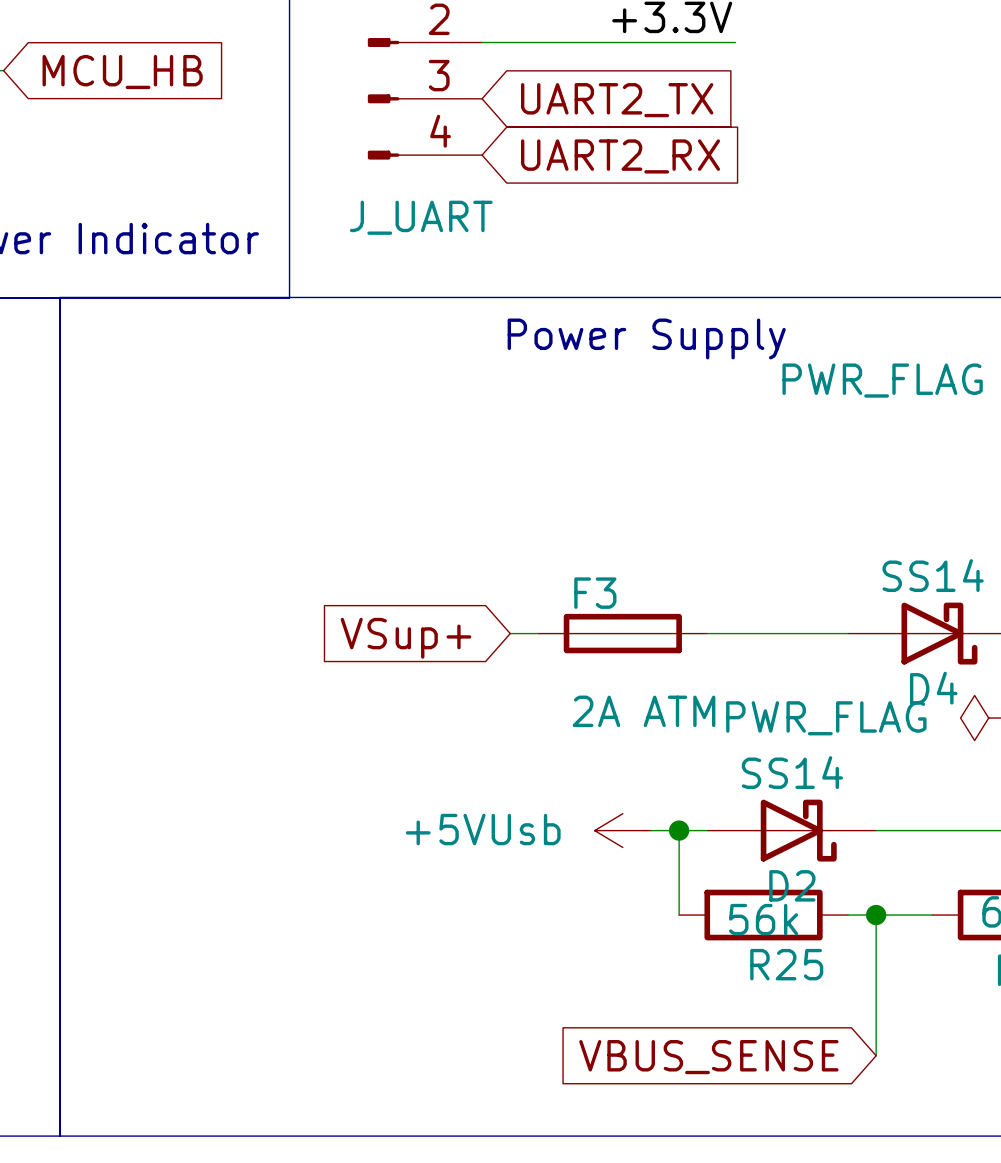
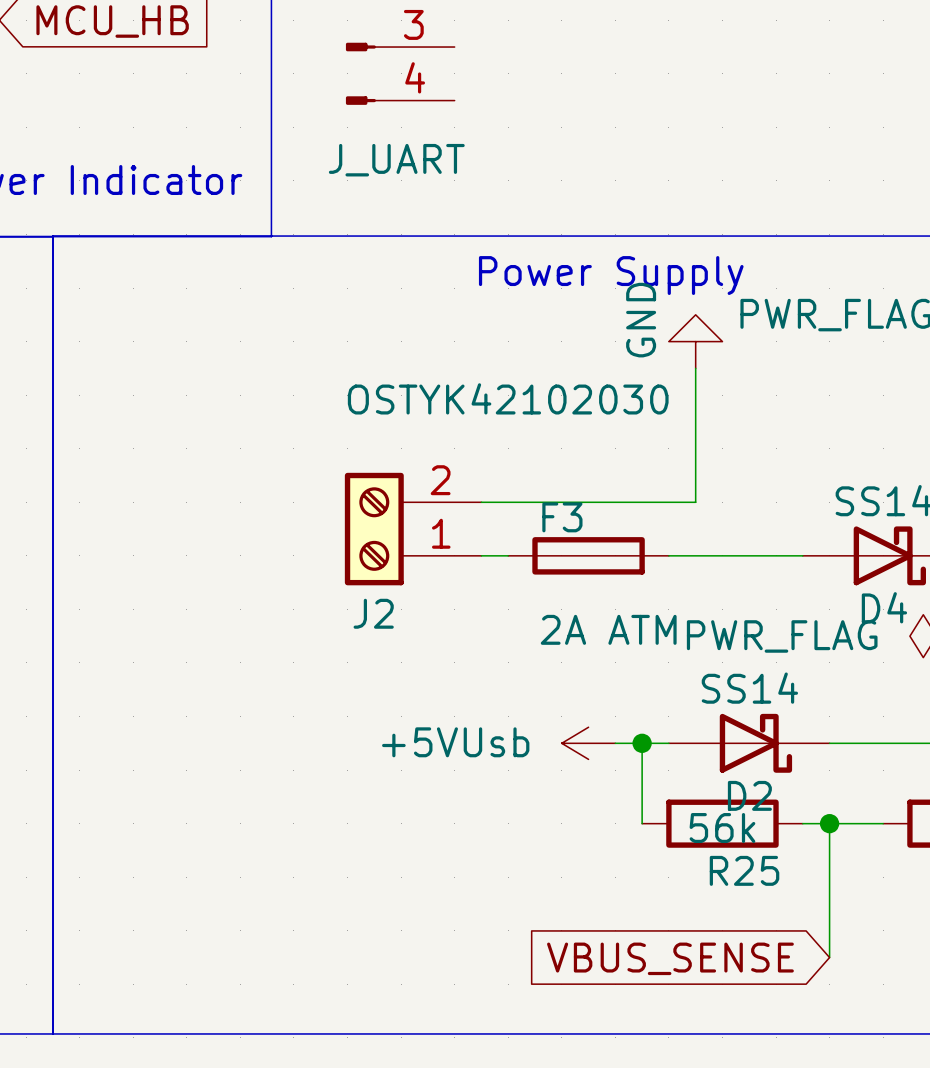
global label: UART2_TX (617, 100) -> none
global label: UART2_RX (620, 156) -> none
power symbol: none -> GND (695, 341)
wire: none -> (695, 368) (695, 502) (481, 502)
J2: none -> OSTYK42102030 (413, 529)
global label: VSup+ (405, 638) -> none

